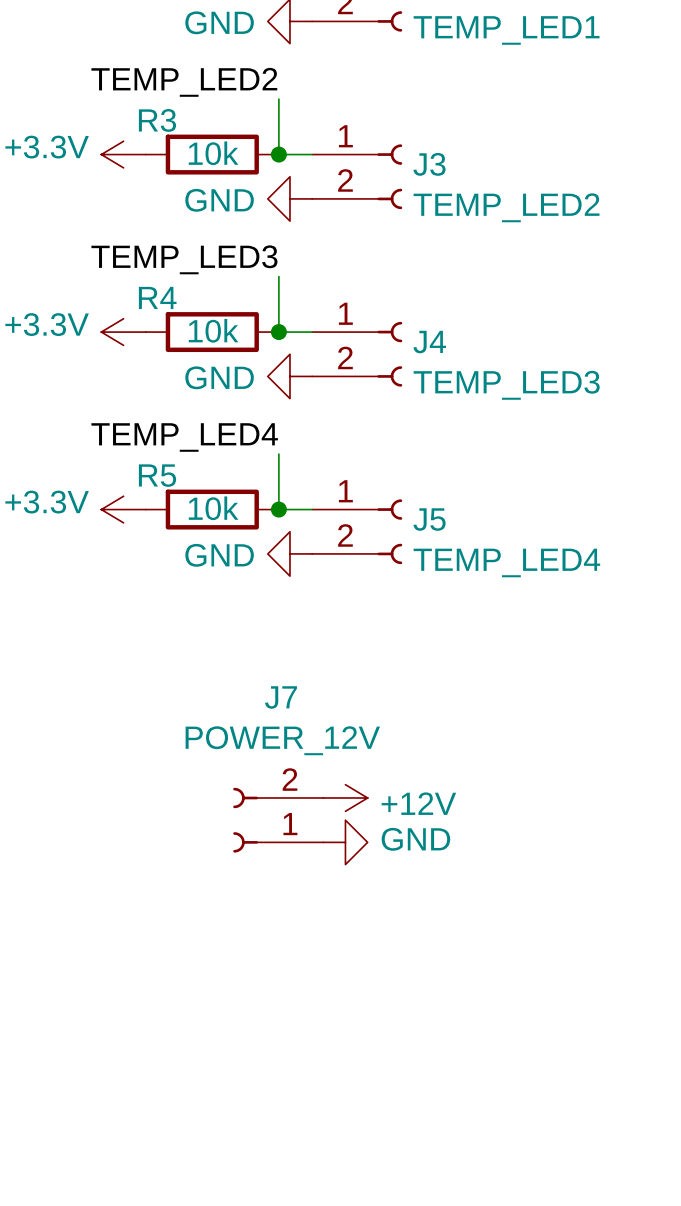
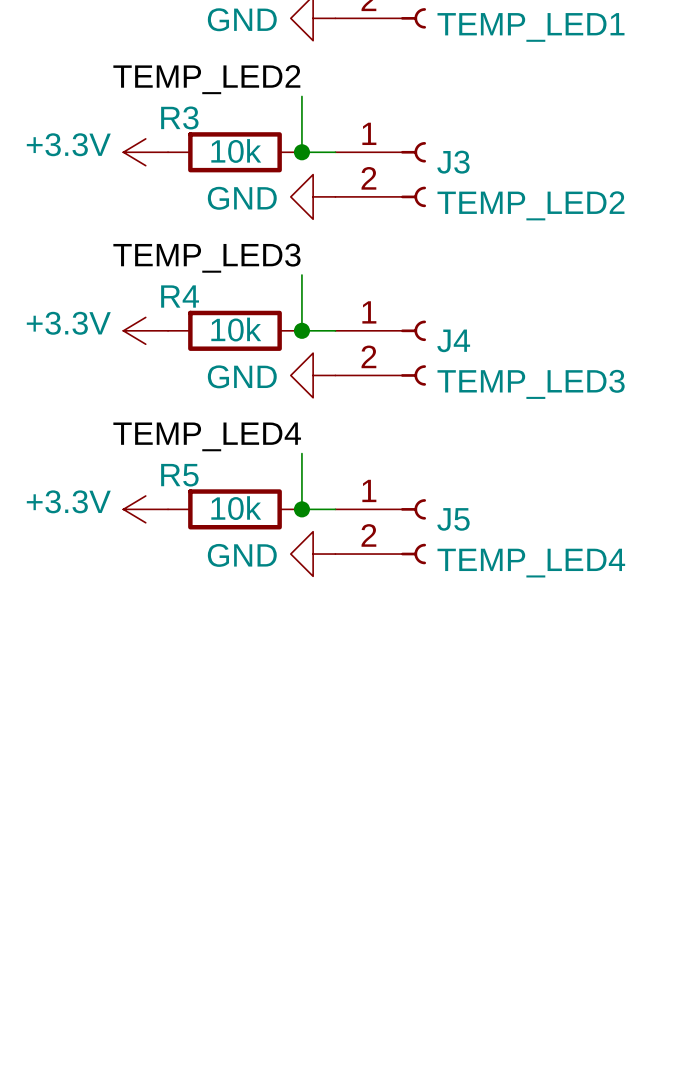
power symbol: +12V (345, 798) -> none
J7: POWER_12V (278, 820) -> none
power symbol: GND (345, 842) -> none

